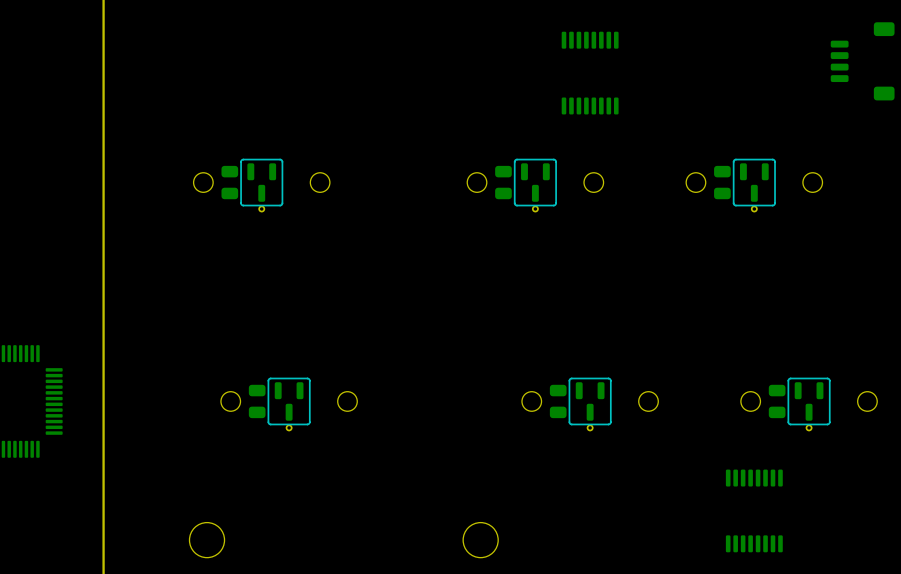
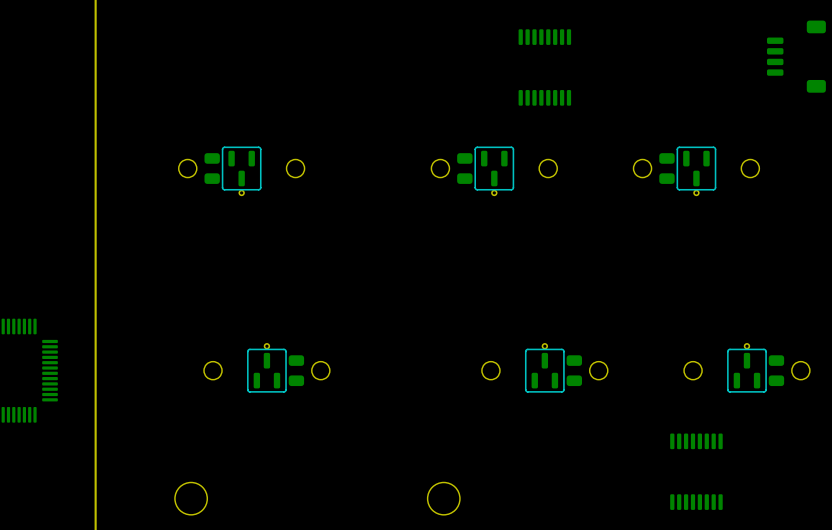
part footprint: [220, 377, 358, 432] -> [204, 343, 330, 393]
part footprint: [521, 377, 659, 432] -> [481, 343, 608, 393]
part footprint: [740, 377, 878, 432] -> [684, 343, 810, 393]
part position: (257, 401) -> (296, 370)
part position: (558, 401) -> (574, 370)
part position: (777, 401) -> (776, 370)

